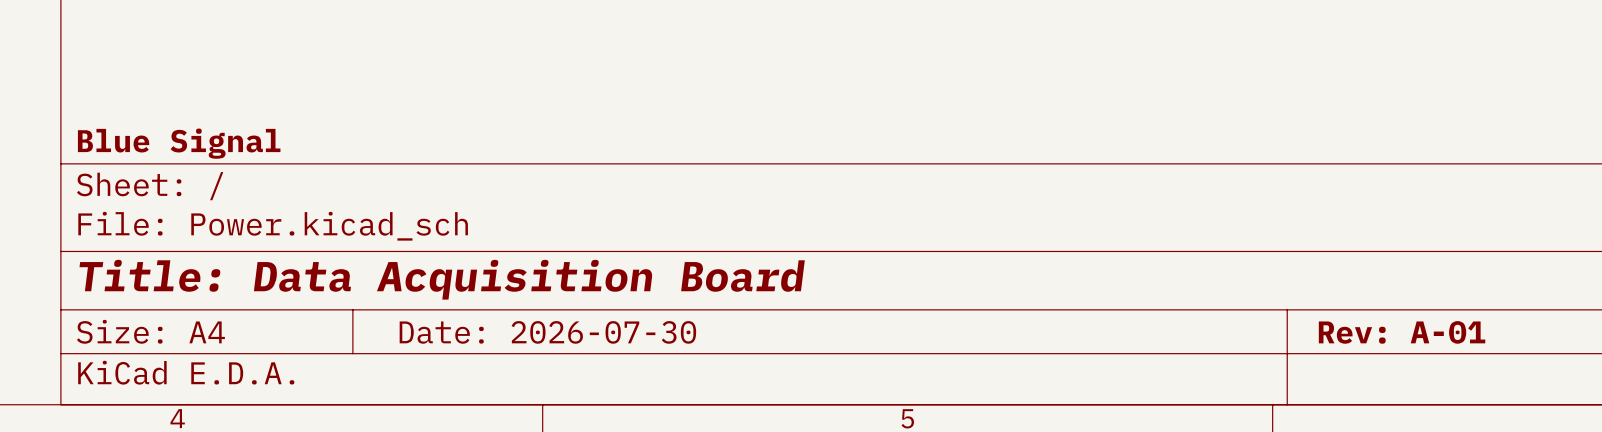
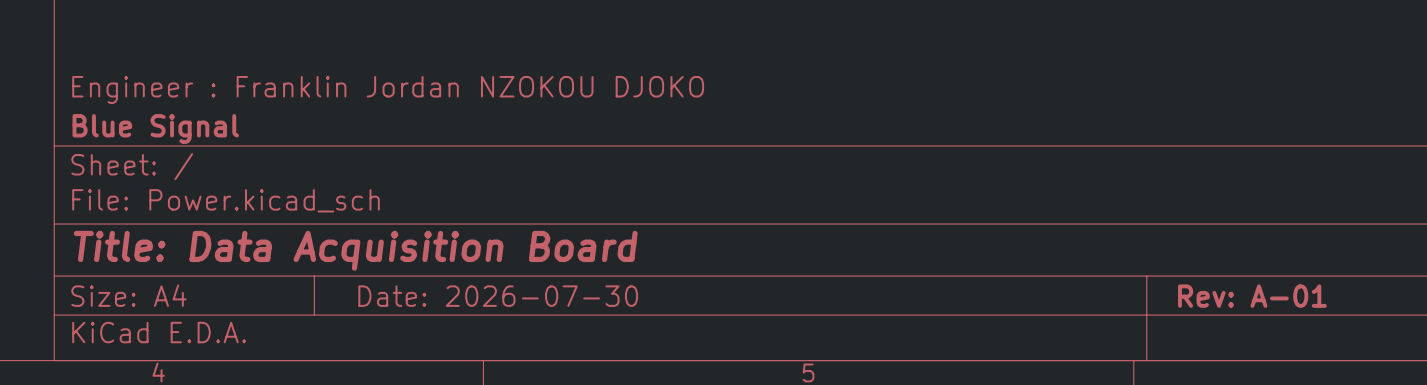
title block: none -> Engineer : Franklin Jordan NZOKOU DJOKO (388, 89)

